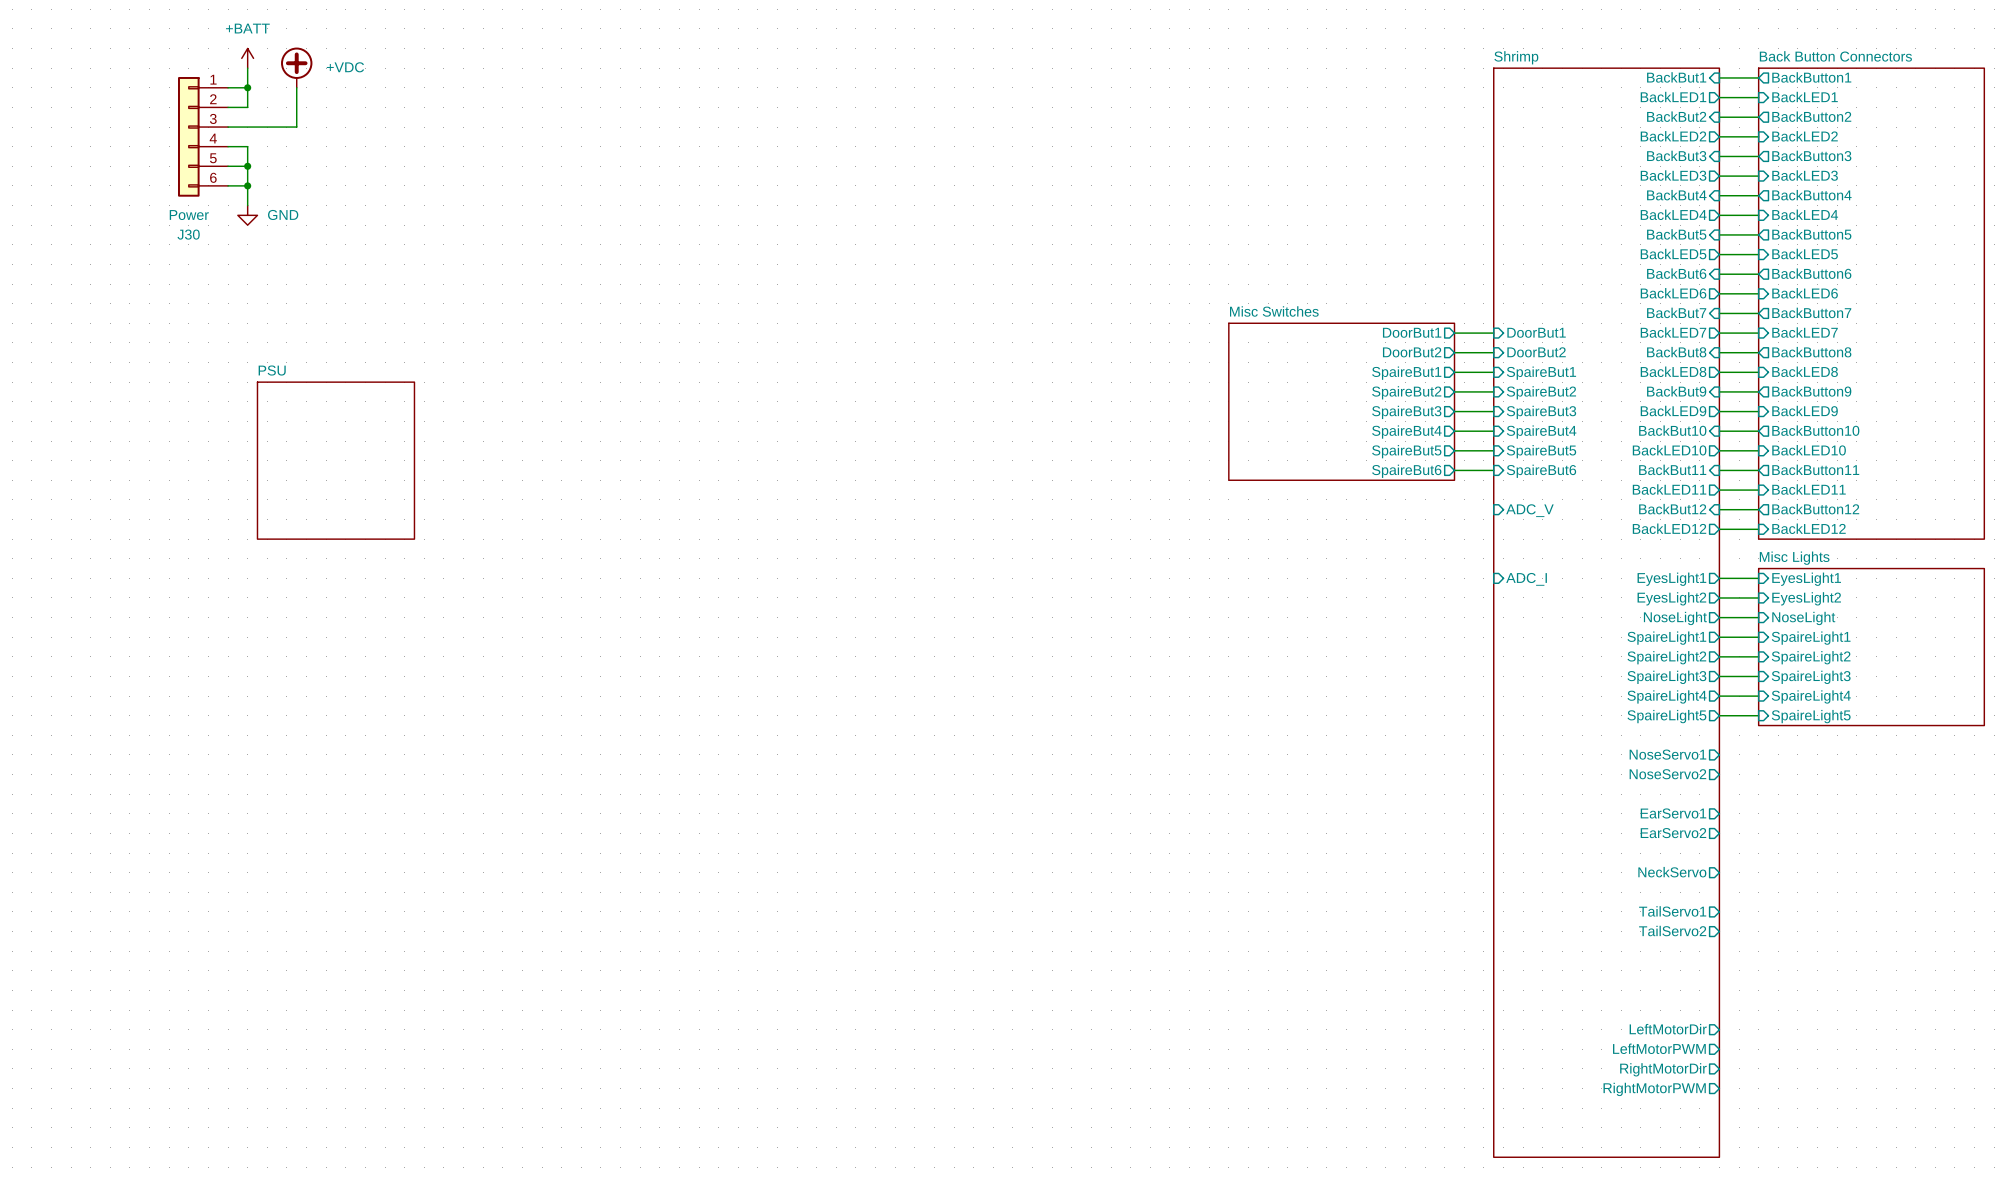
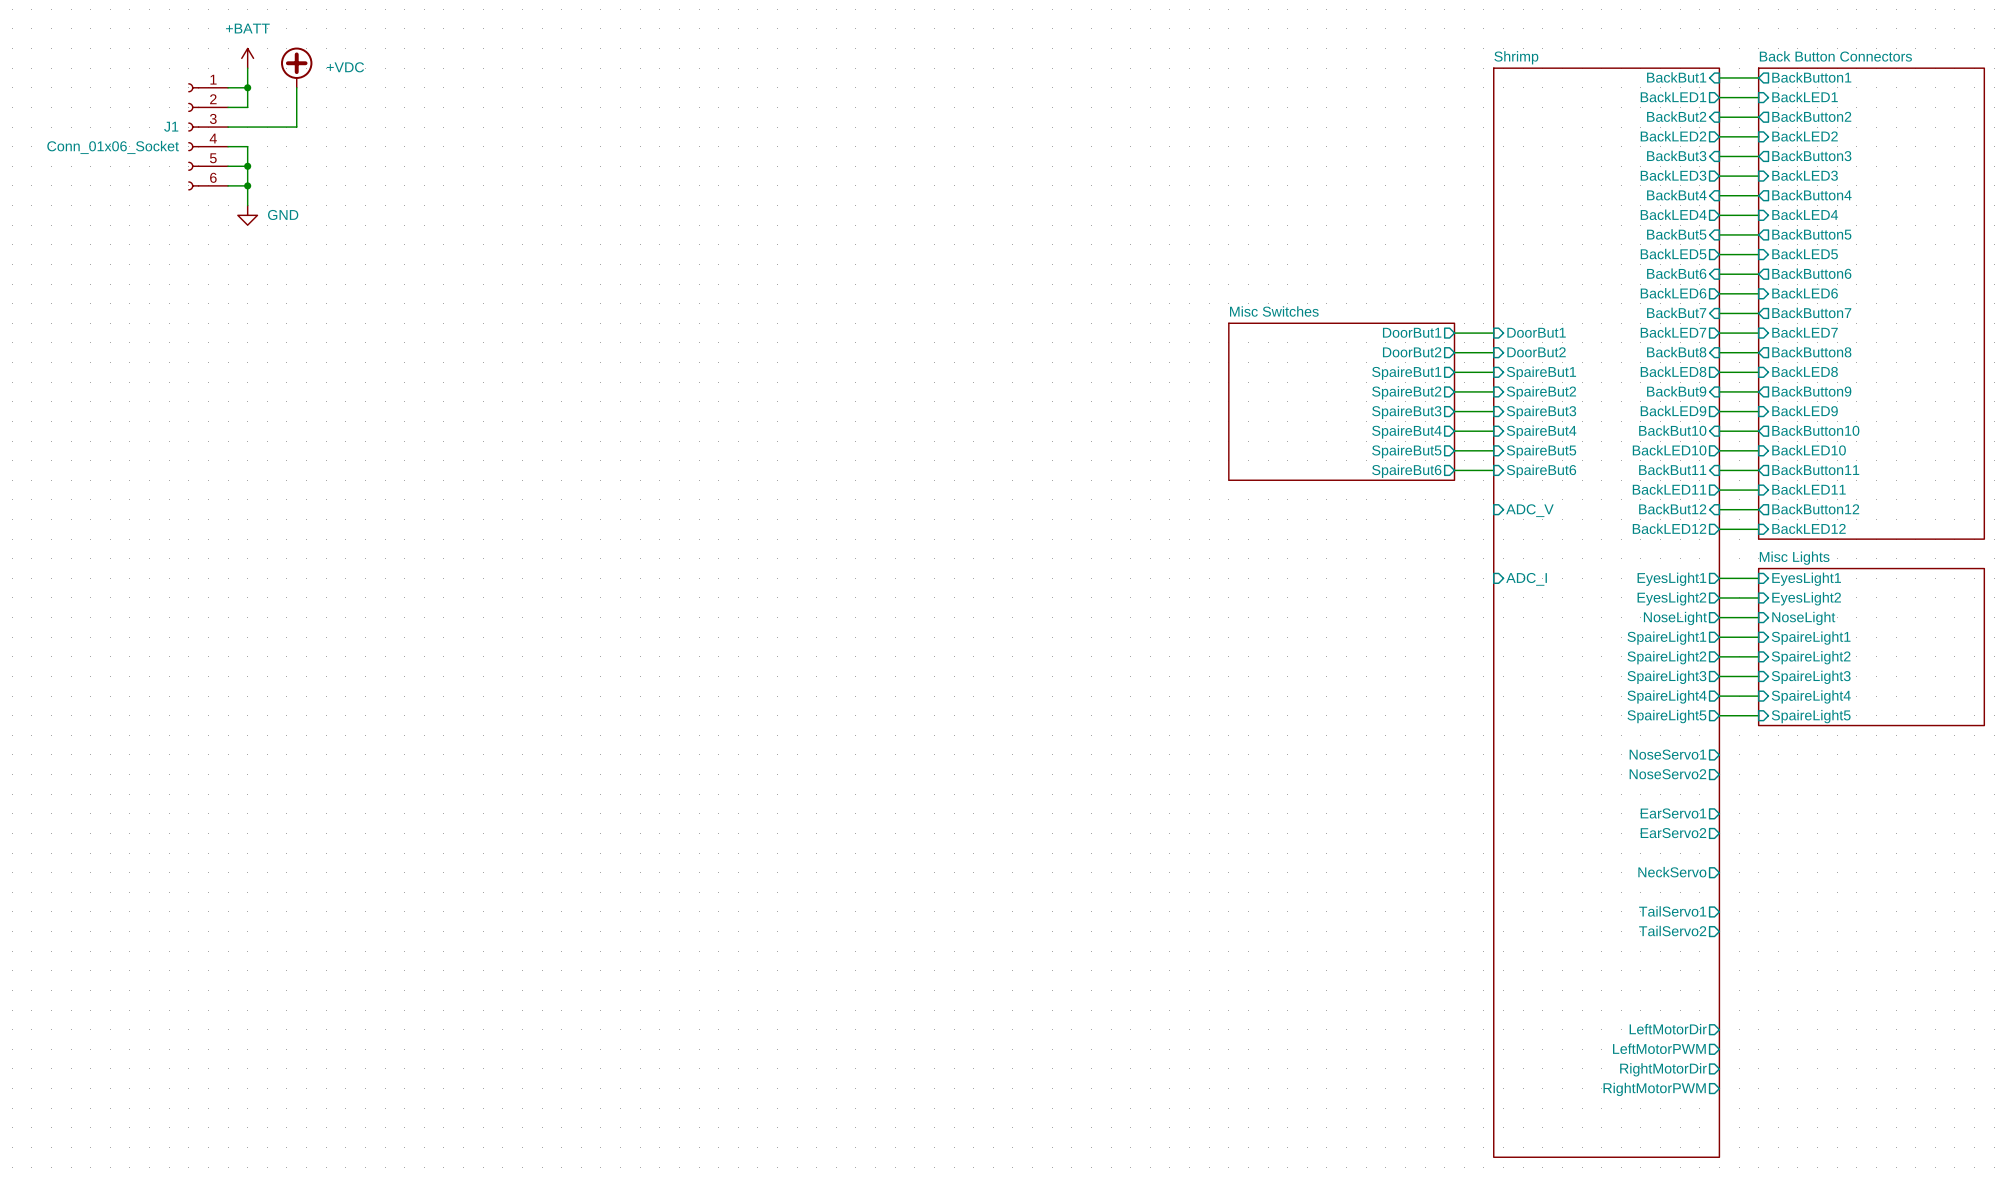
J30: Power (203, 136) -> none
J1: none -> Conn_01x06_Socket (208, 136)
sheet PSU: (335, 460) -> none

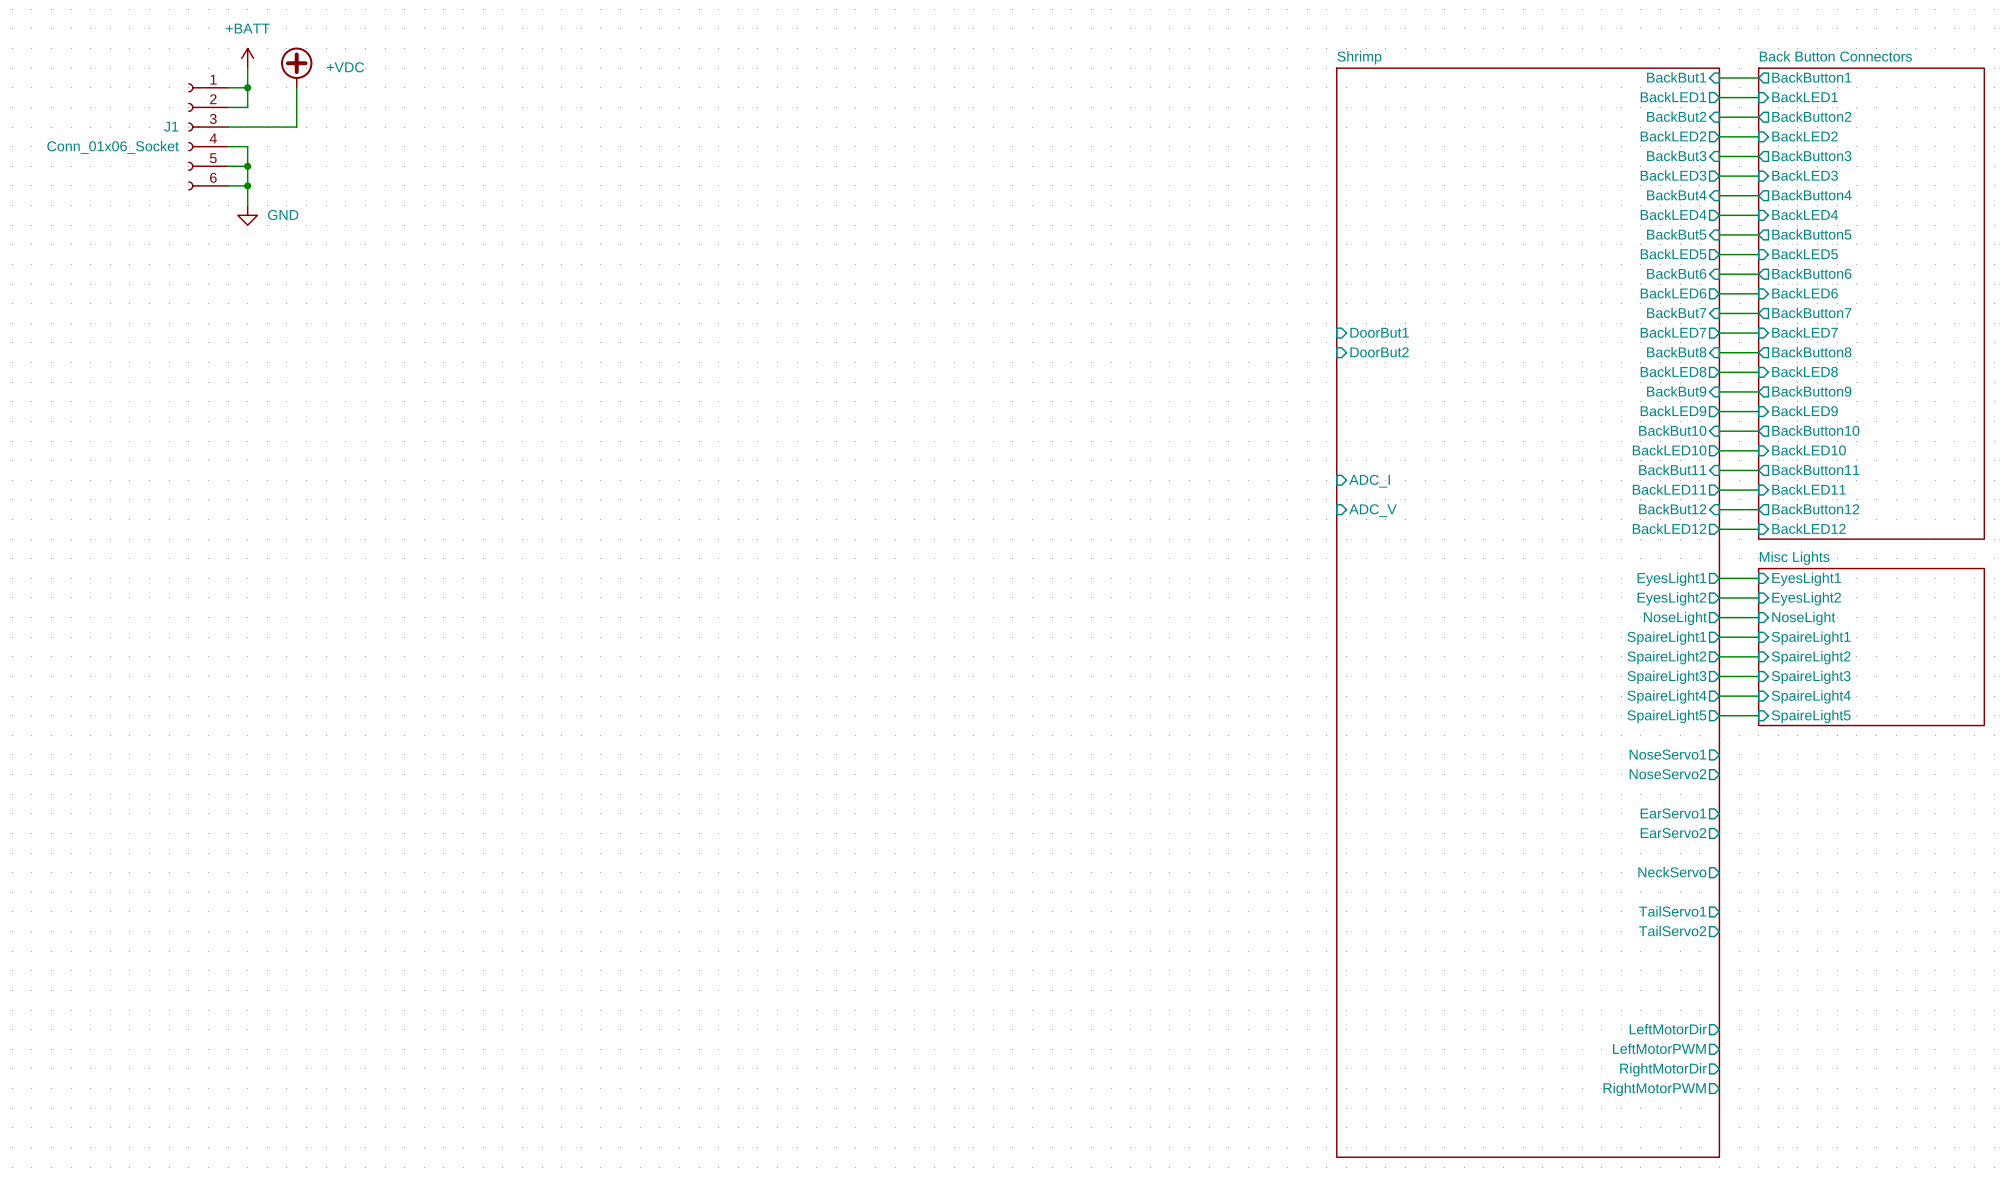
sheet pin: none -> DoorBut1 (1379, 332)
sheet pin: DoorBut1 (1412, 332) -> none
sheet pin: DoorBut1 (1536, 332) -> none
wire: (1454, 333) (1493, 333) -> none
sheet pin: none -> DoorBut2 (1379, 352)
sheet pin: DoorBut2 (1412, 352) -> none
wire: (1454, 352) (1493, 352) -> none
sheet pin: DoorBut2 (1536, 352) -> none
wire: (1454, 372) (1493, 372) -> none
sheet pin: SpaireBut1 (1406, 373) -> none
sheet pin: SpaireBut1 (1541, 373) -> none
wire: (1454, 391) (1493, 391) -> none
sheet pin: SpaireBut2 (1406, 392) -> none
sheet pin: SpaireBut2 (1541, 392) -> none
sheet Misc Switches: (1341, 401) -> none
wire: (1454, 411) (1493, 411) -> none
sheet pin: SpaireBut3 (1406, 412) -> none
sheet pin: SpaireBut3 (1541, 412) -> none
wire: (1454, 431) (1493, 431) -> none
sheet pin: SpaireBut4 (1406, 432) -> none
sheet pin: SpaireBut4 (1541, 432) -> none
wire: (1454, 450) (1493, 450) -> none
sheet pin: SpaireBut5 (1406, 451) -> none
sheet pin: SpaireBut5 (1541, 451) -> none
wire: (1454, 470) (1493, 470) -> none
sheet pin: SpaireBut6 (1406, 471) -> none
sheet pin: SpaireBut6 (1541, 471) -> none
sheet pin position: ADC_V (1529, 510) -> ADC_V (1372, 510)
sheet pin position: ADC_I (1526, 579) -> ADC_I (1369, 481)
sheet Shrimp: none -> (1528, 612)
sheet Shrimp: (1606, 612) -> none

